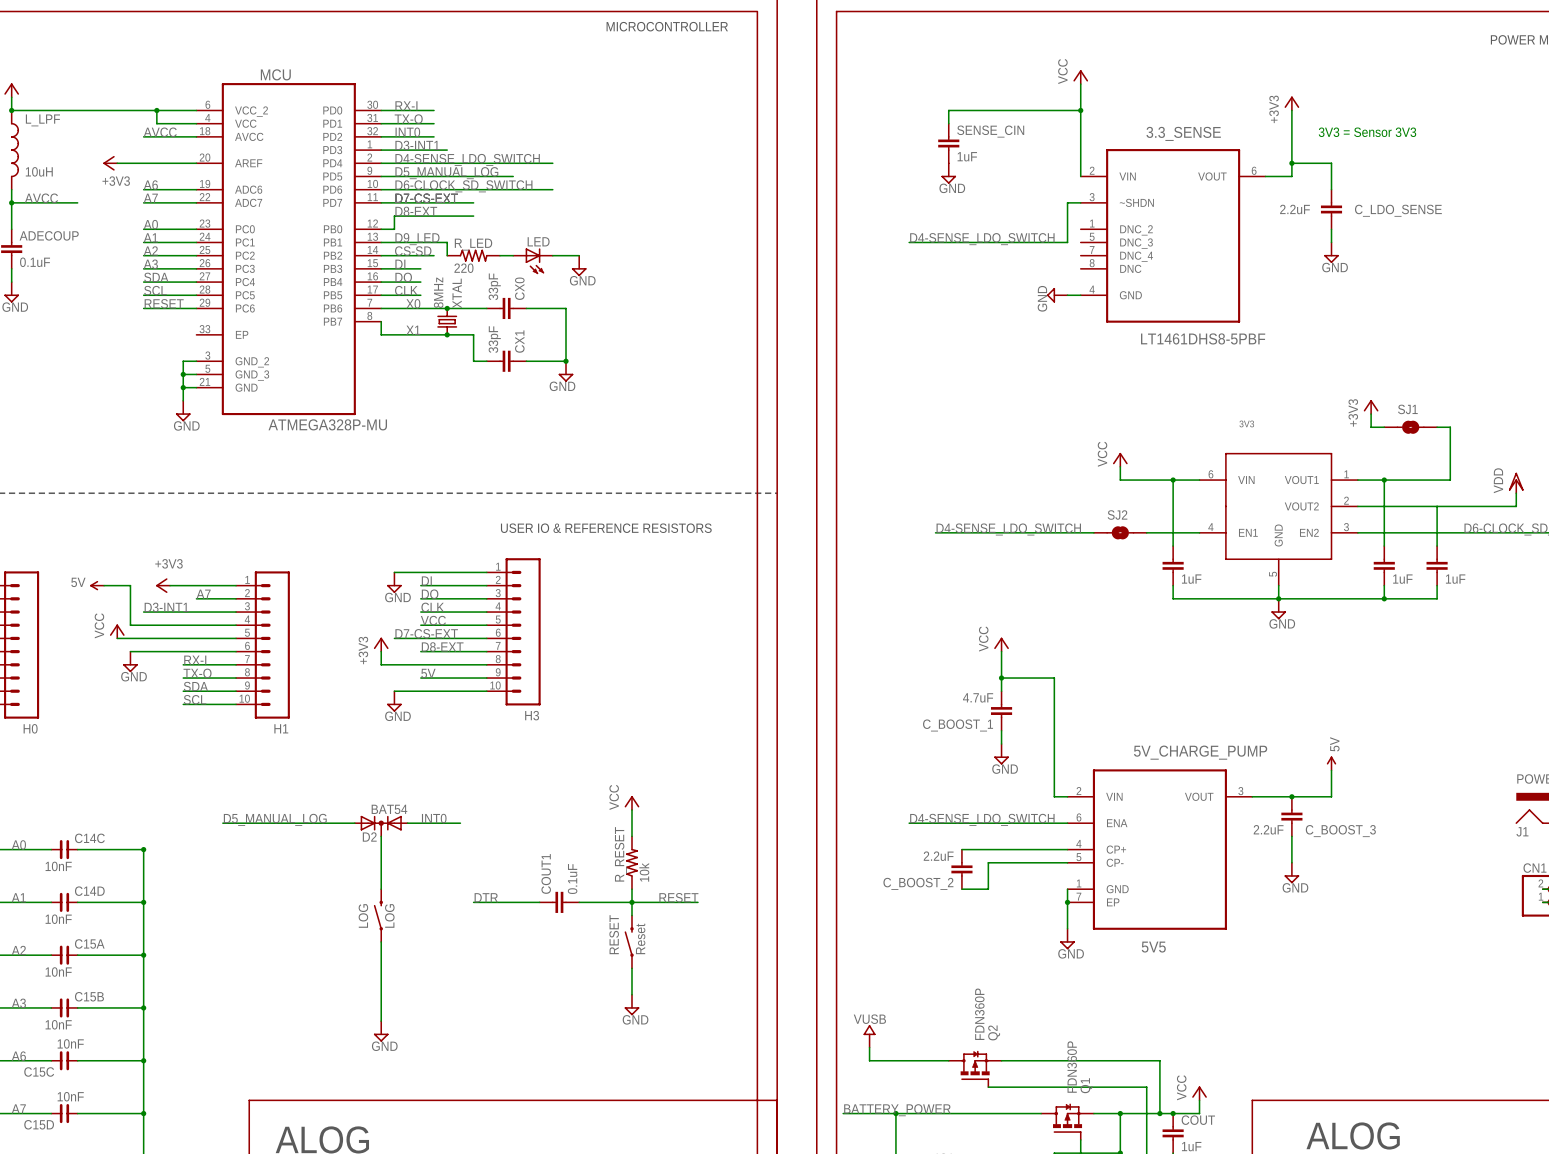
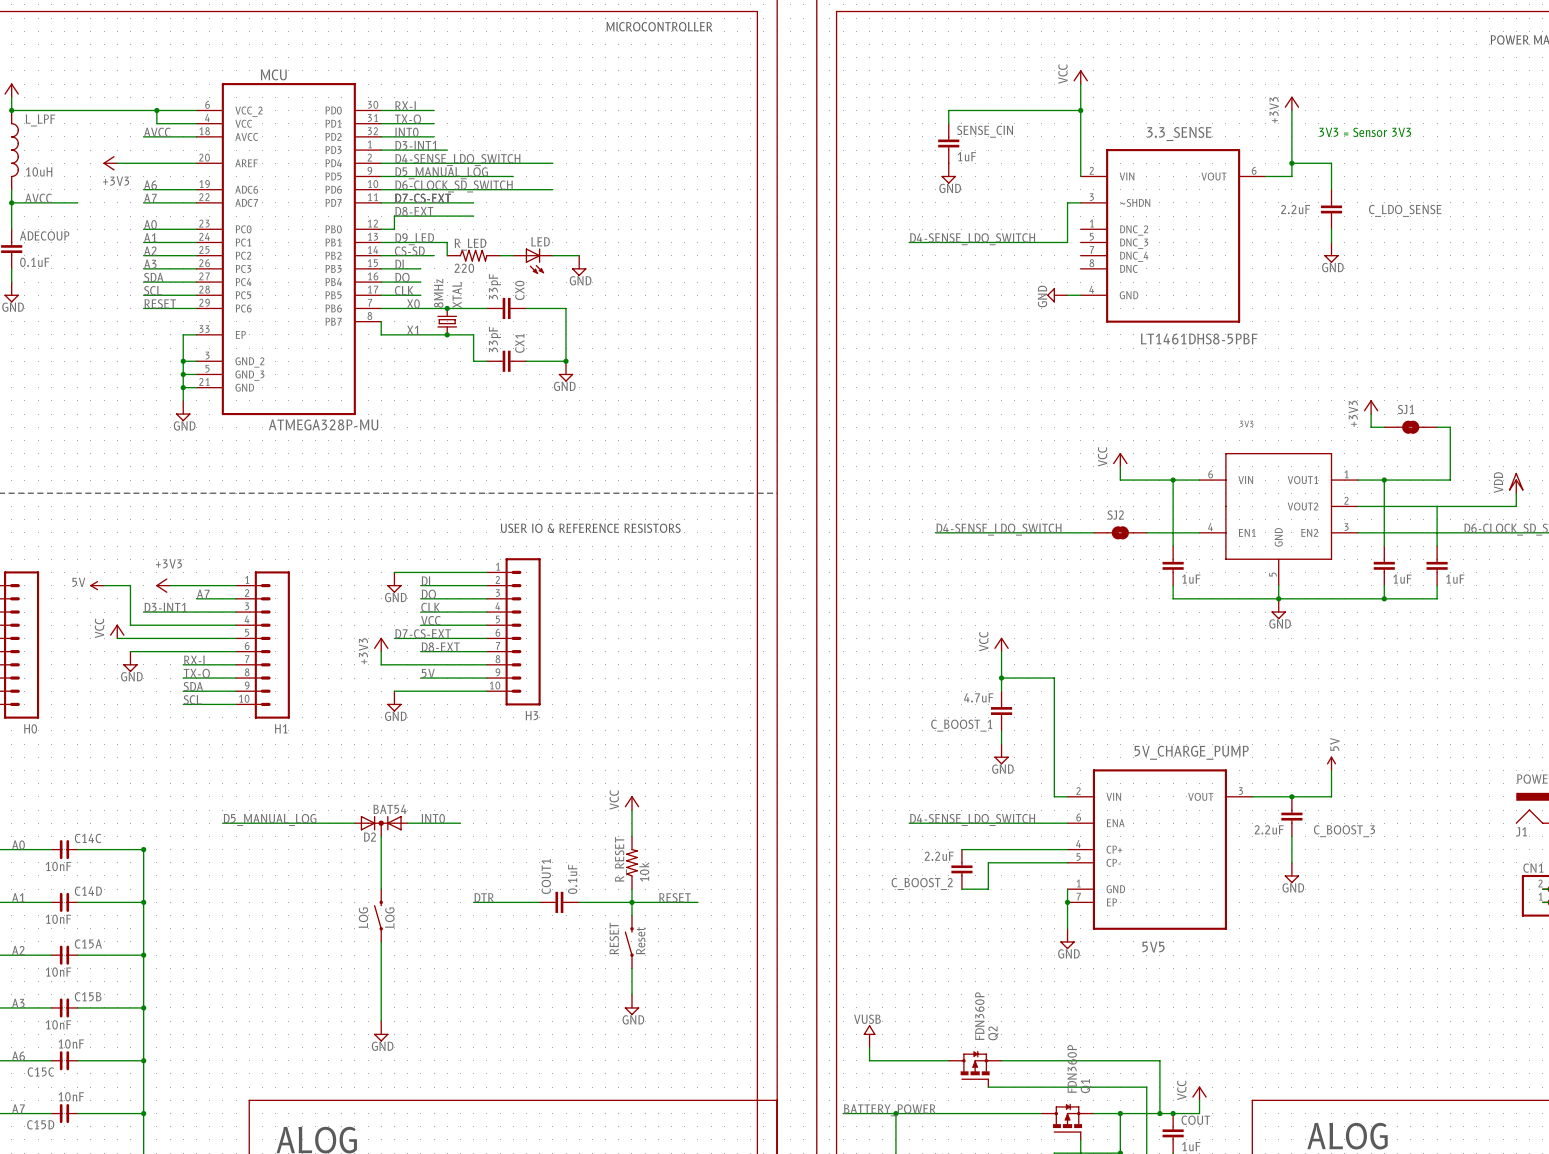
wire: none -> (196, 334) (183, 334) (183, 361)
junction: none -> (183, 361)

